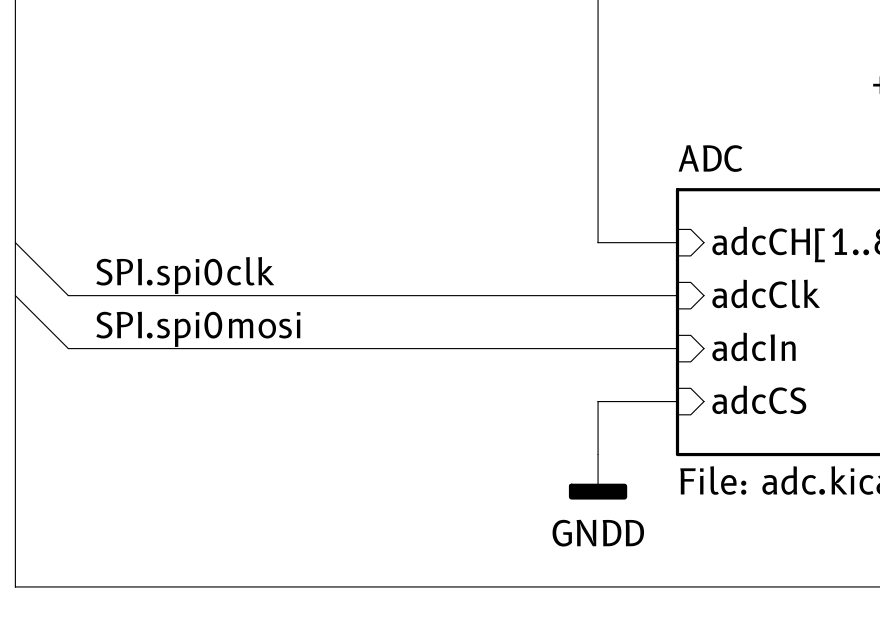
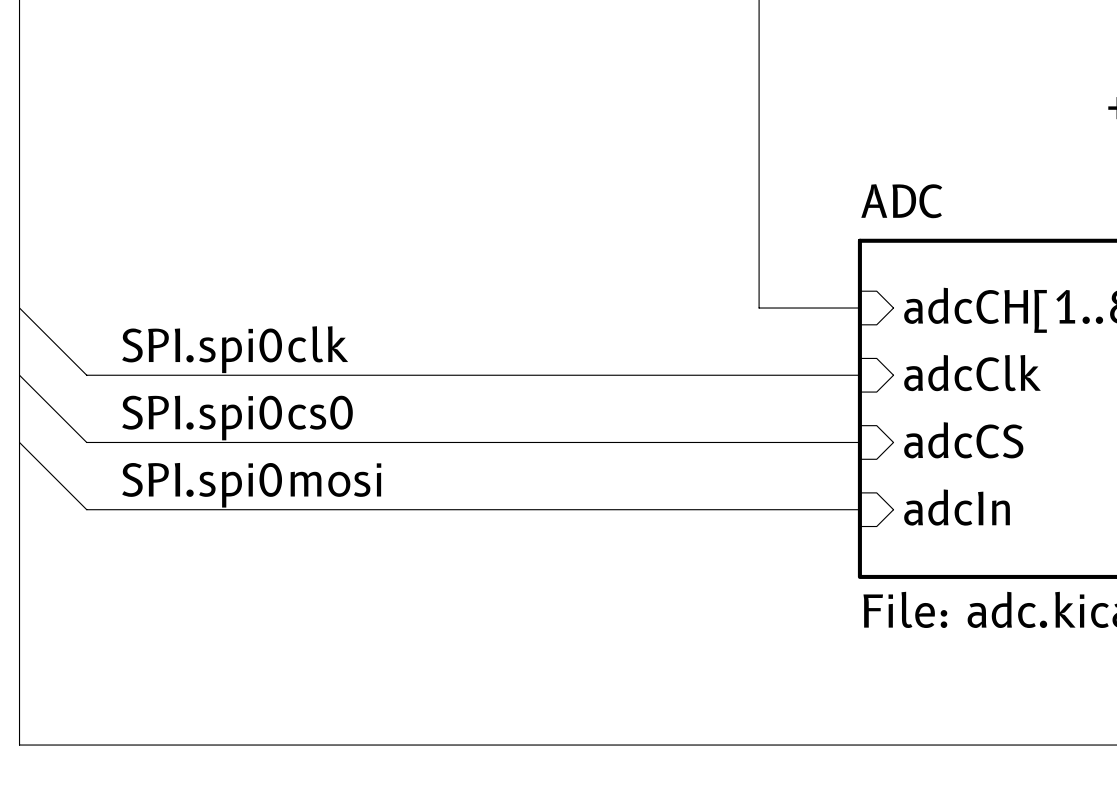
label: SPI.spi0mosi (198, 329) -> SPI.spi0cs0 (237, 418)
sheet pin: adcIn (753, 346) -> adcCS (963, 440)
label: none -> SPI.spi0mosi (251, 485)
sheet pin: adcCS (759, 399) -> adcIn (957, 507)
wire: (598, 401) (598, 454) -> (759, 509) (86, 509) (19, 442)
power symbol: GNDD (598, 477) -> none

